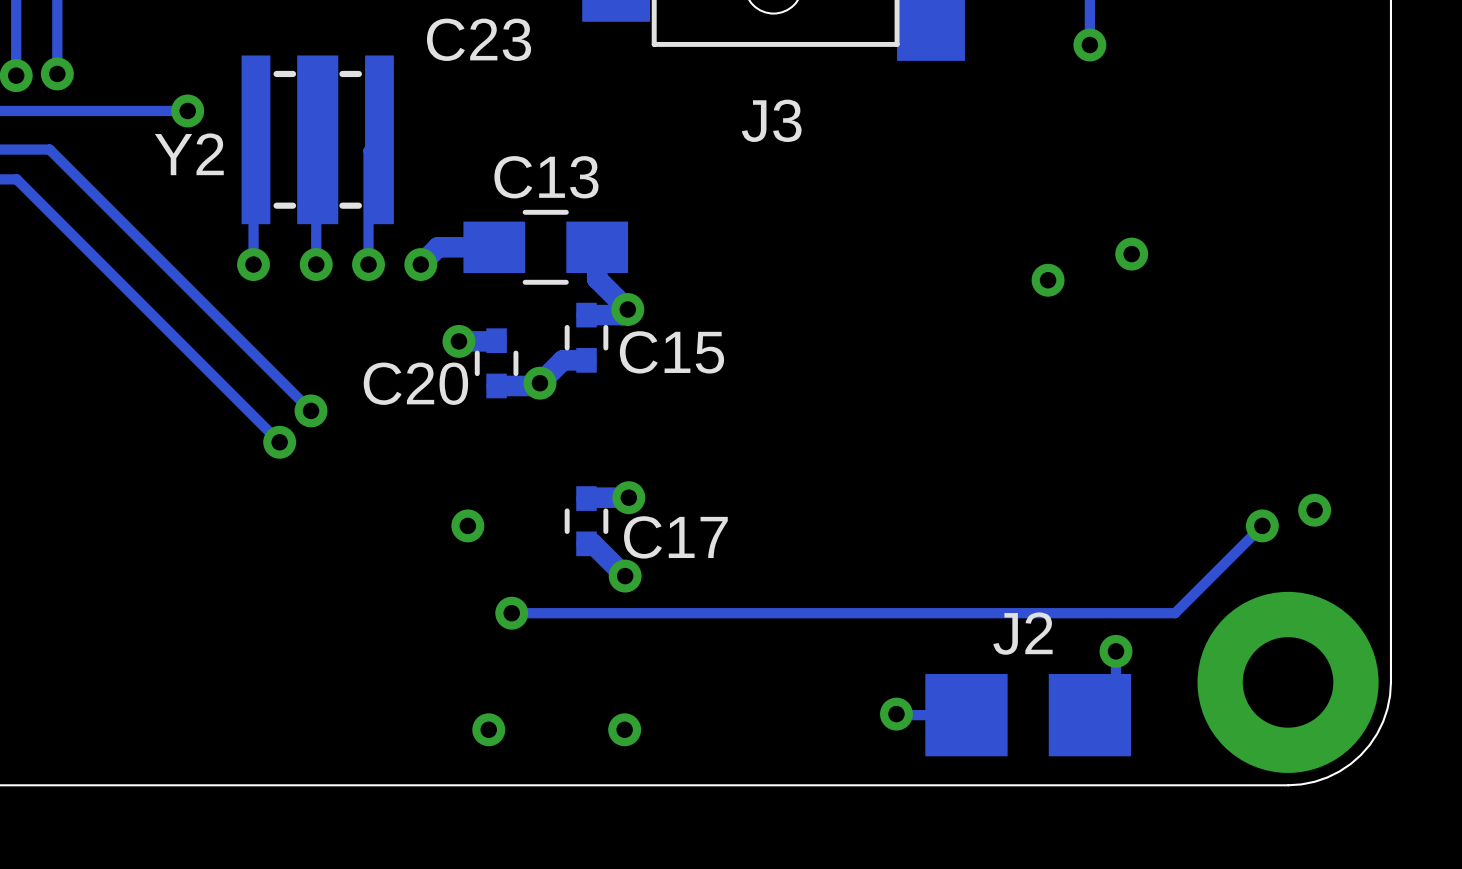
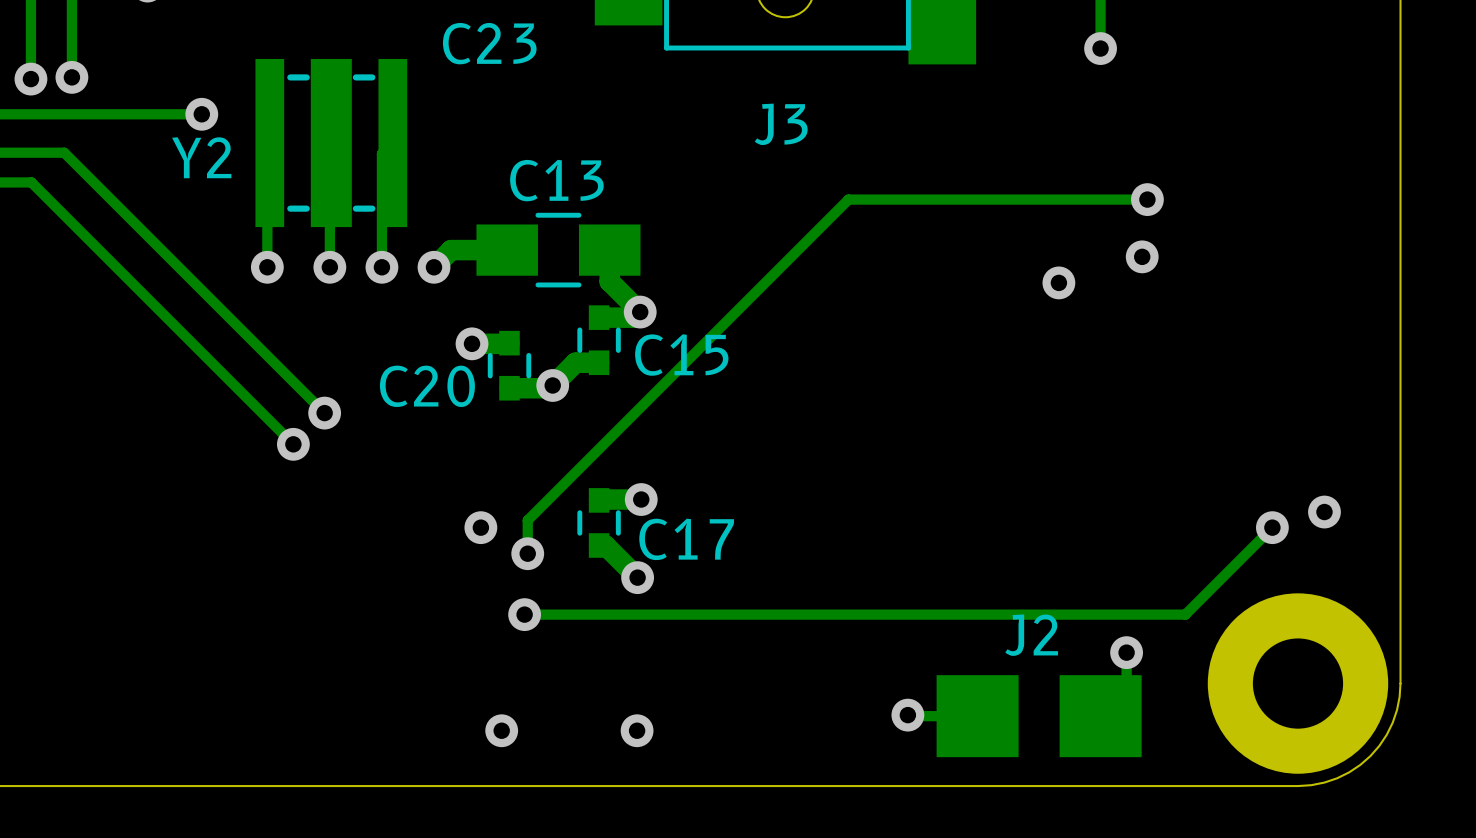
track: none -> (1147, 199) (848, 199) (527, 520) (527, 553)
via: none -> (1147, 199)
via: none -> (527, 553)

